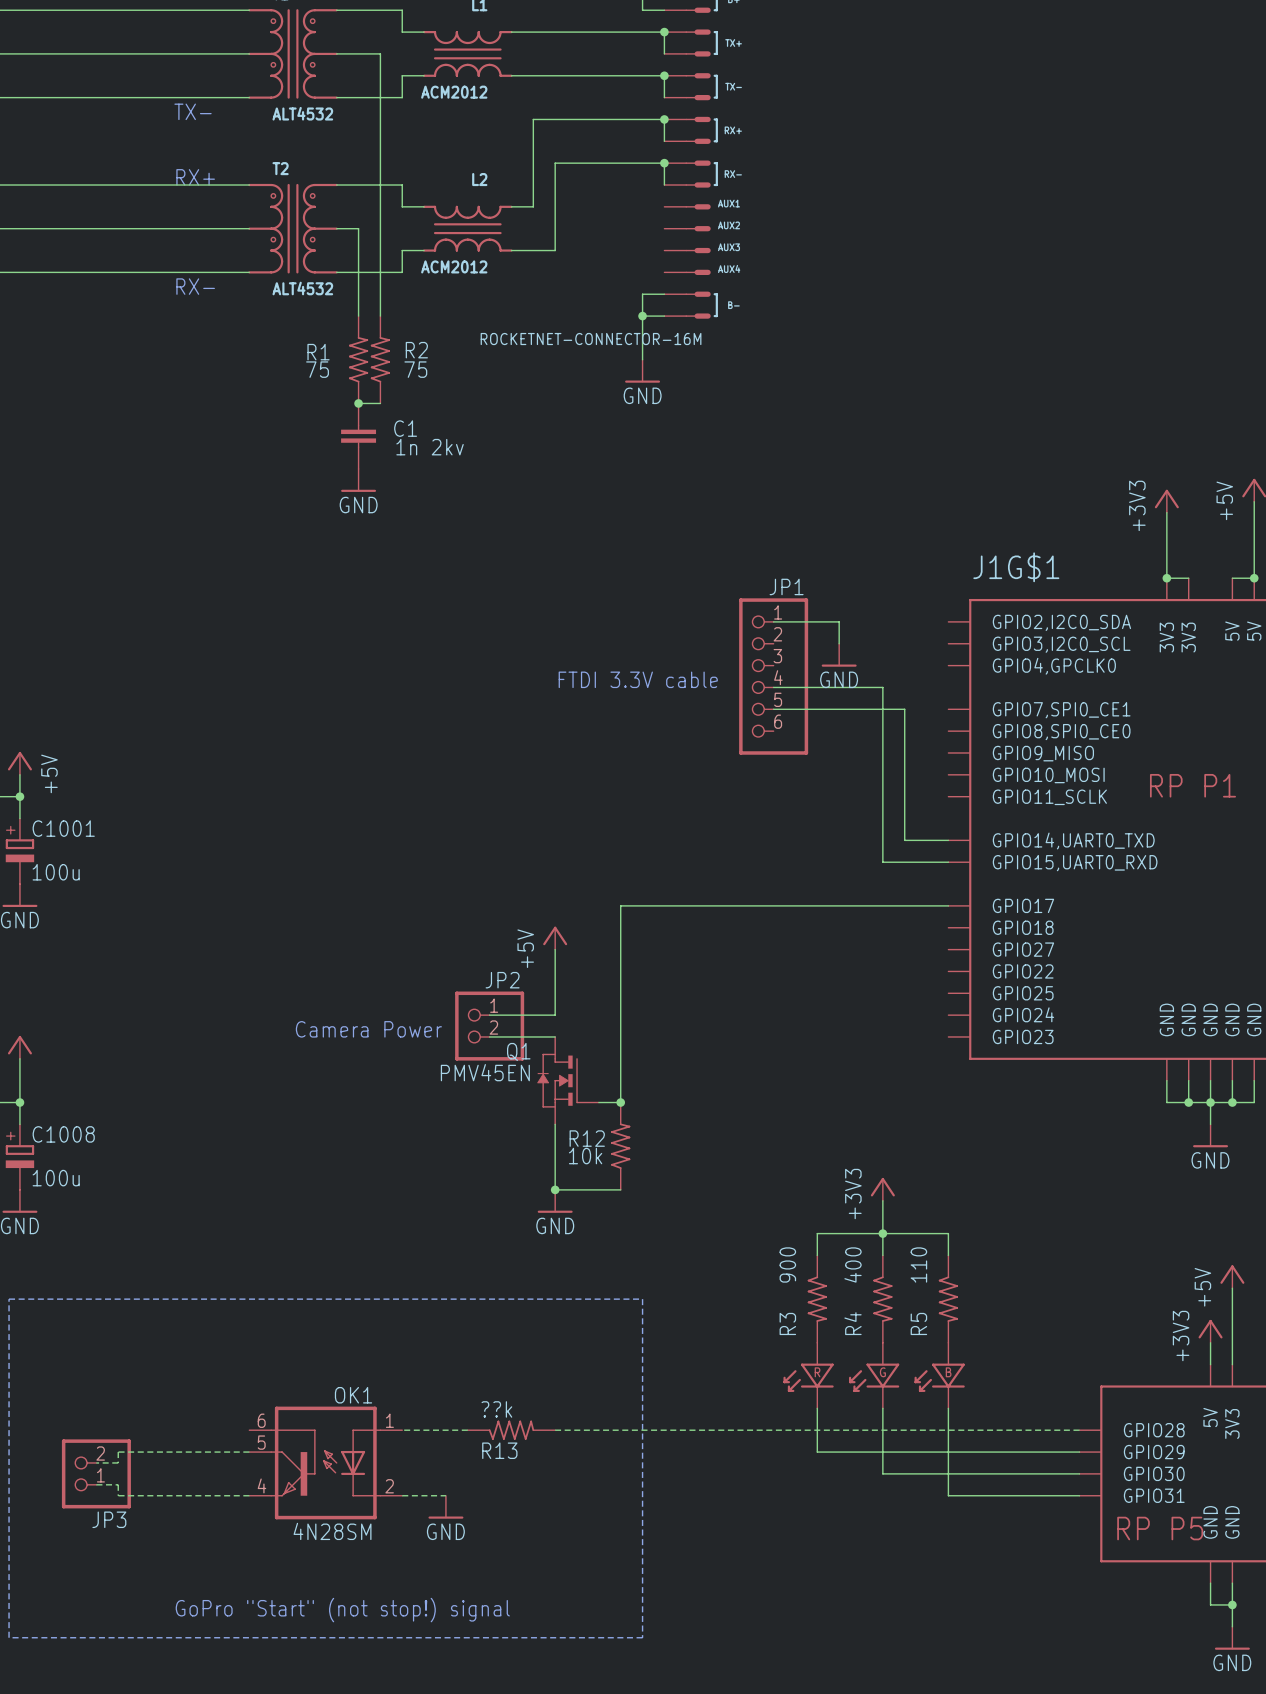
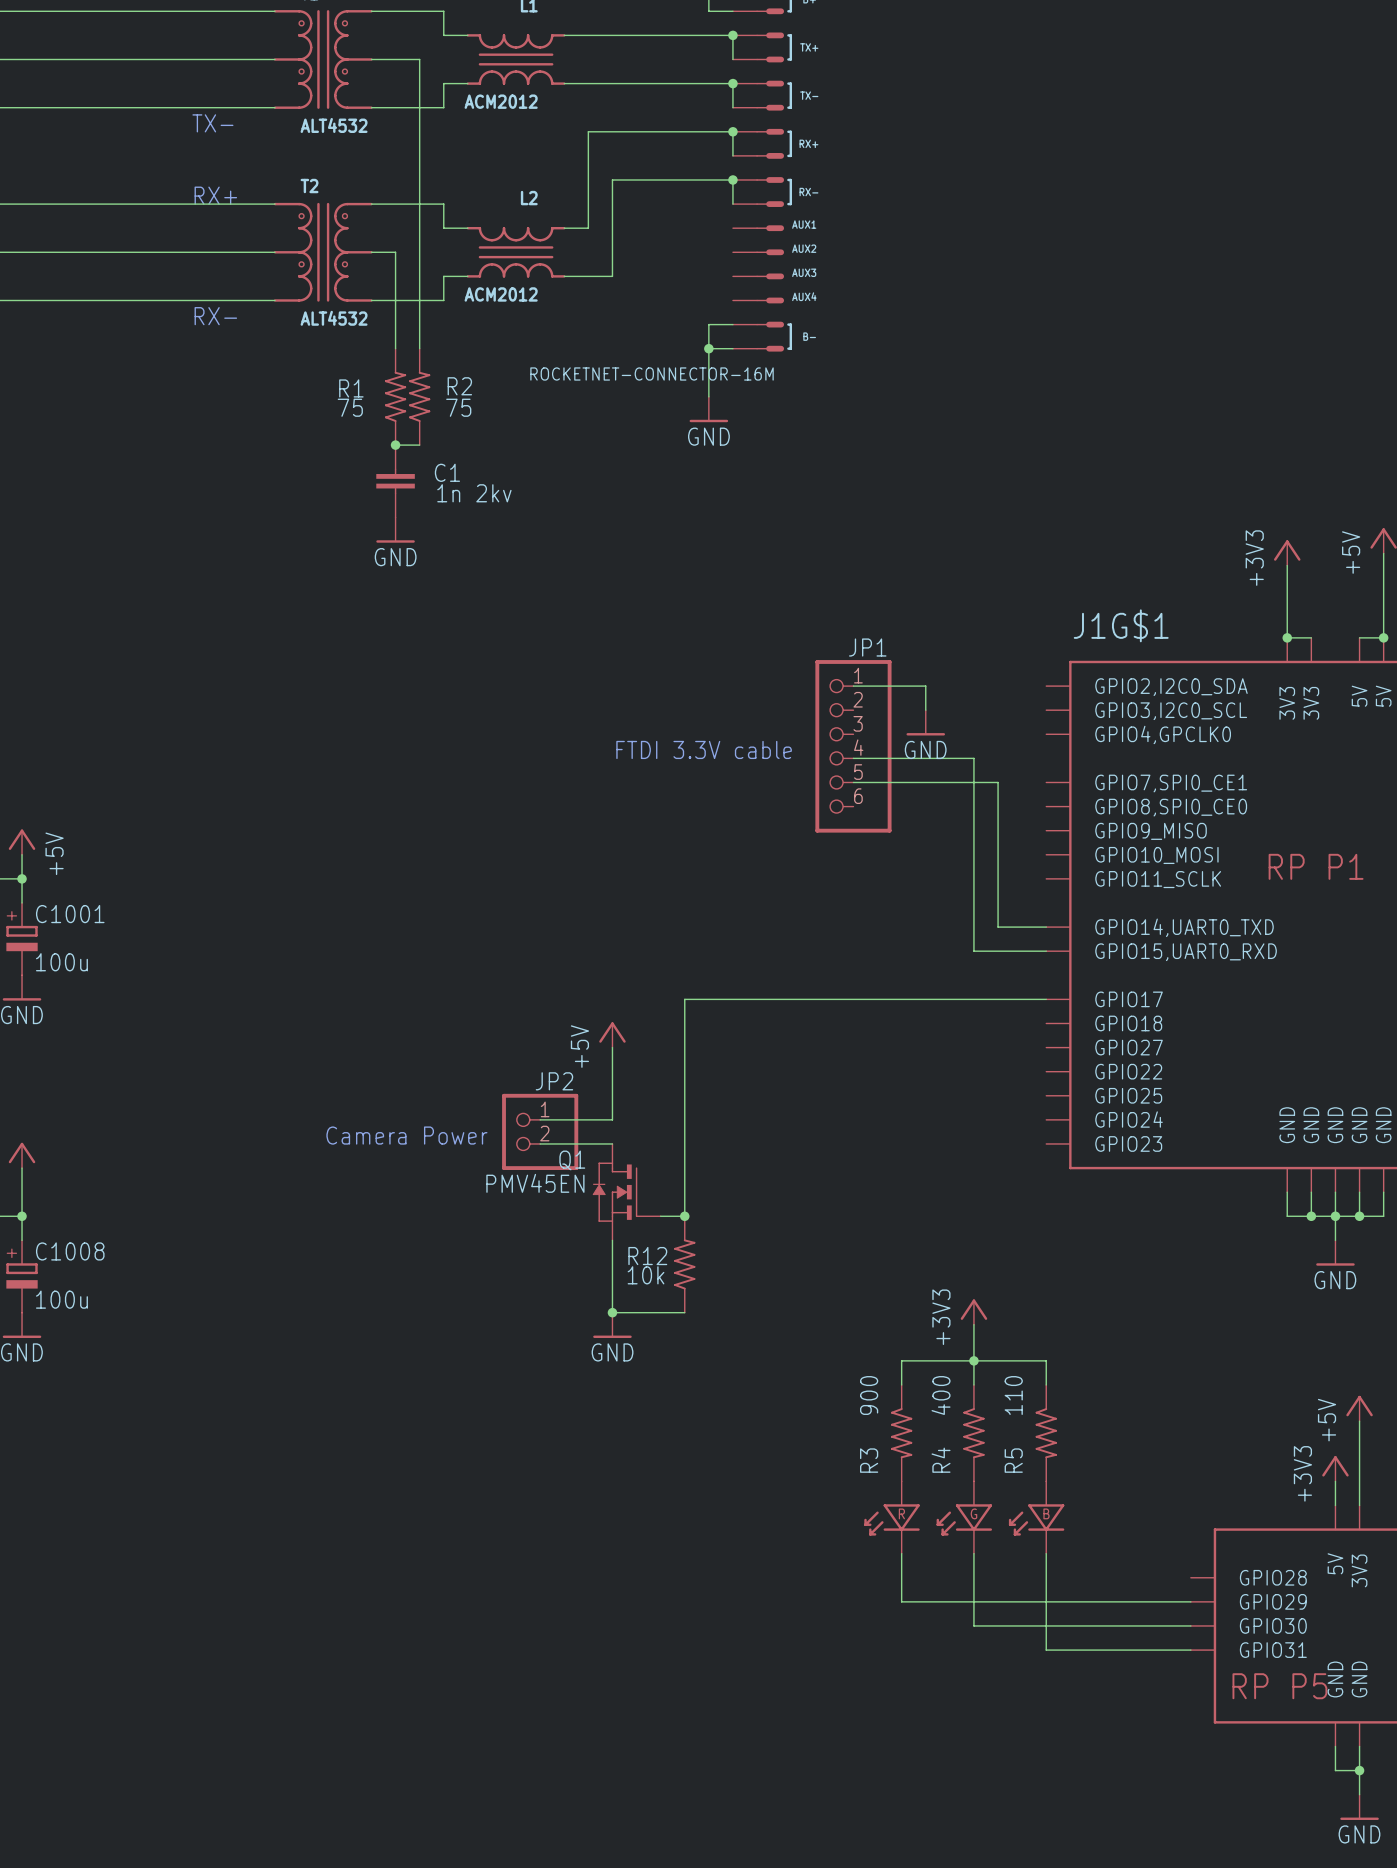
line: (9, 1299) (642, 1299) (642, 1637) (9, 1637) (9, 1299) -> none
wire: (402, 1430) (467, 1430) -> none
R13: ??k (511, 1430) -> none
wire: (555, 1430) (1079, 1430) -> none
wire: (249, 1452) (118, 1452) (118, 1462) (96, 1462) -> none
OK1: 4N28SM (325, 1462) -> none
JP3: (96, 1473) -> none
wire: (96, 1484) (118, 1484) (118, 1495) (249, 1495) -> none
wire: (402, 1495) (445, 1495) -> none
power symbol: GND (445, 1507) -> none
text: GoPro "Start" (not stop!) signal (342, 1610) -> none

